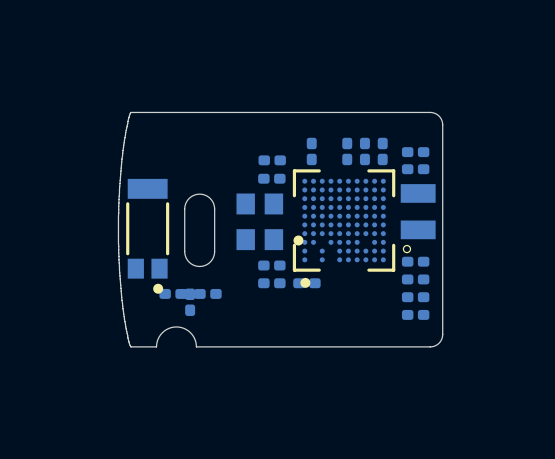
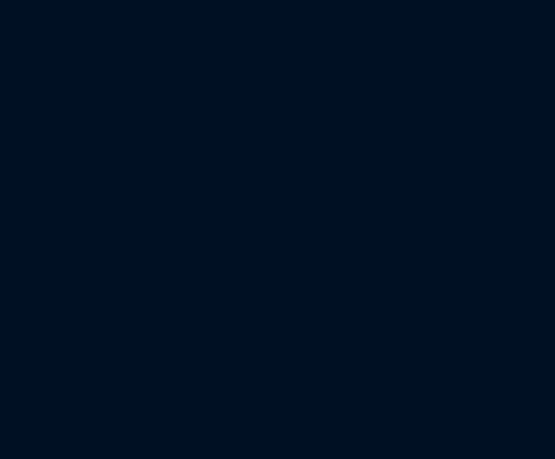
board edge: (430, 112) (130, 112) (122, 150) (118, 216) (121, 300) (130, 346) (156, 346) (158, 339) (162, 332) (168, 328) (176, 326) (184, 328) (190, 332) (194, 339) (196, 346) (430, 346) (437, 344) (442, 334) (442, 124) (439, 116) (430, 112) -> none
part: (311, 151) -> none
part: (347, 151) -> none
part: (364, 151) -> none
part: (382, 151) -> none
part: (415, 152) -> none
part: (272, 160) -> none
part: (415, 169) -> none
part: (271, 178) -> none
board edge: (214, 209) (213, 257) (205, 265) (193, 265) (187, 260) (184, 253) (185, 203) (192, 196) (201, 194) (210, 198) (214, 209) -> none
part: (418, 218) -> none
part: (269, 221) -> none
part: (344, 228) -> none
part: (147, 236) -> none
part: (415, 261) -> none
part: (271, 265) -> none
part: (415, 279) -> none
part: (271, 283) -> none
part: (306, 283) -> none
part: (173, 293) -> none
part: (207, 293) -> none
part: (415, 297) -> none
part: (190, 302) -> none
part: (415, 314) -> none

